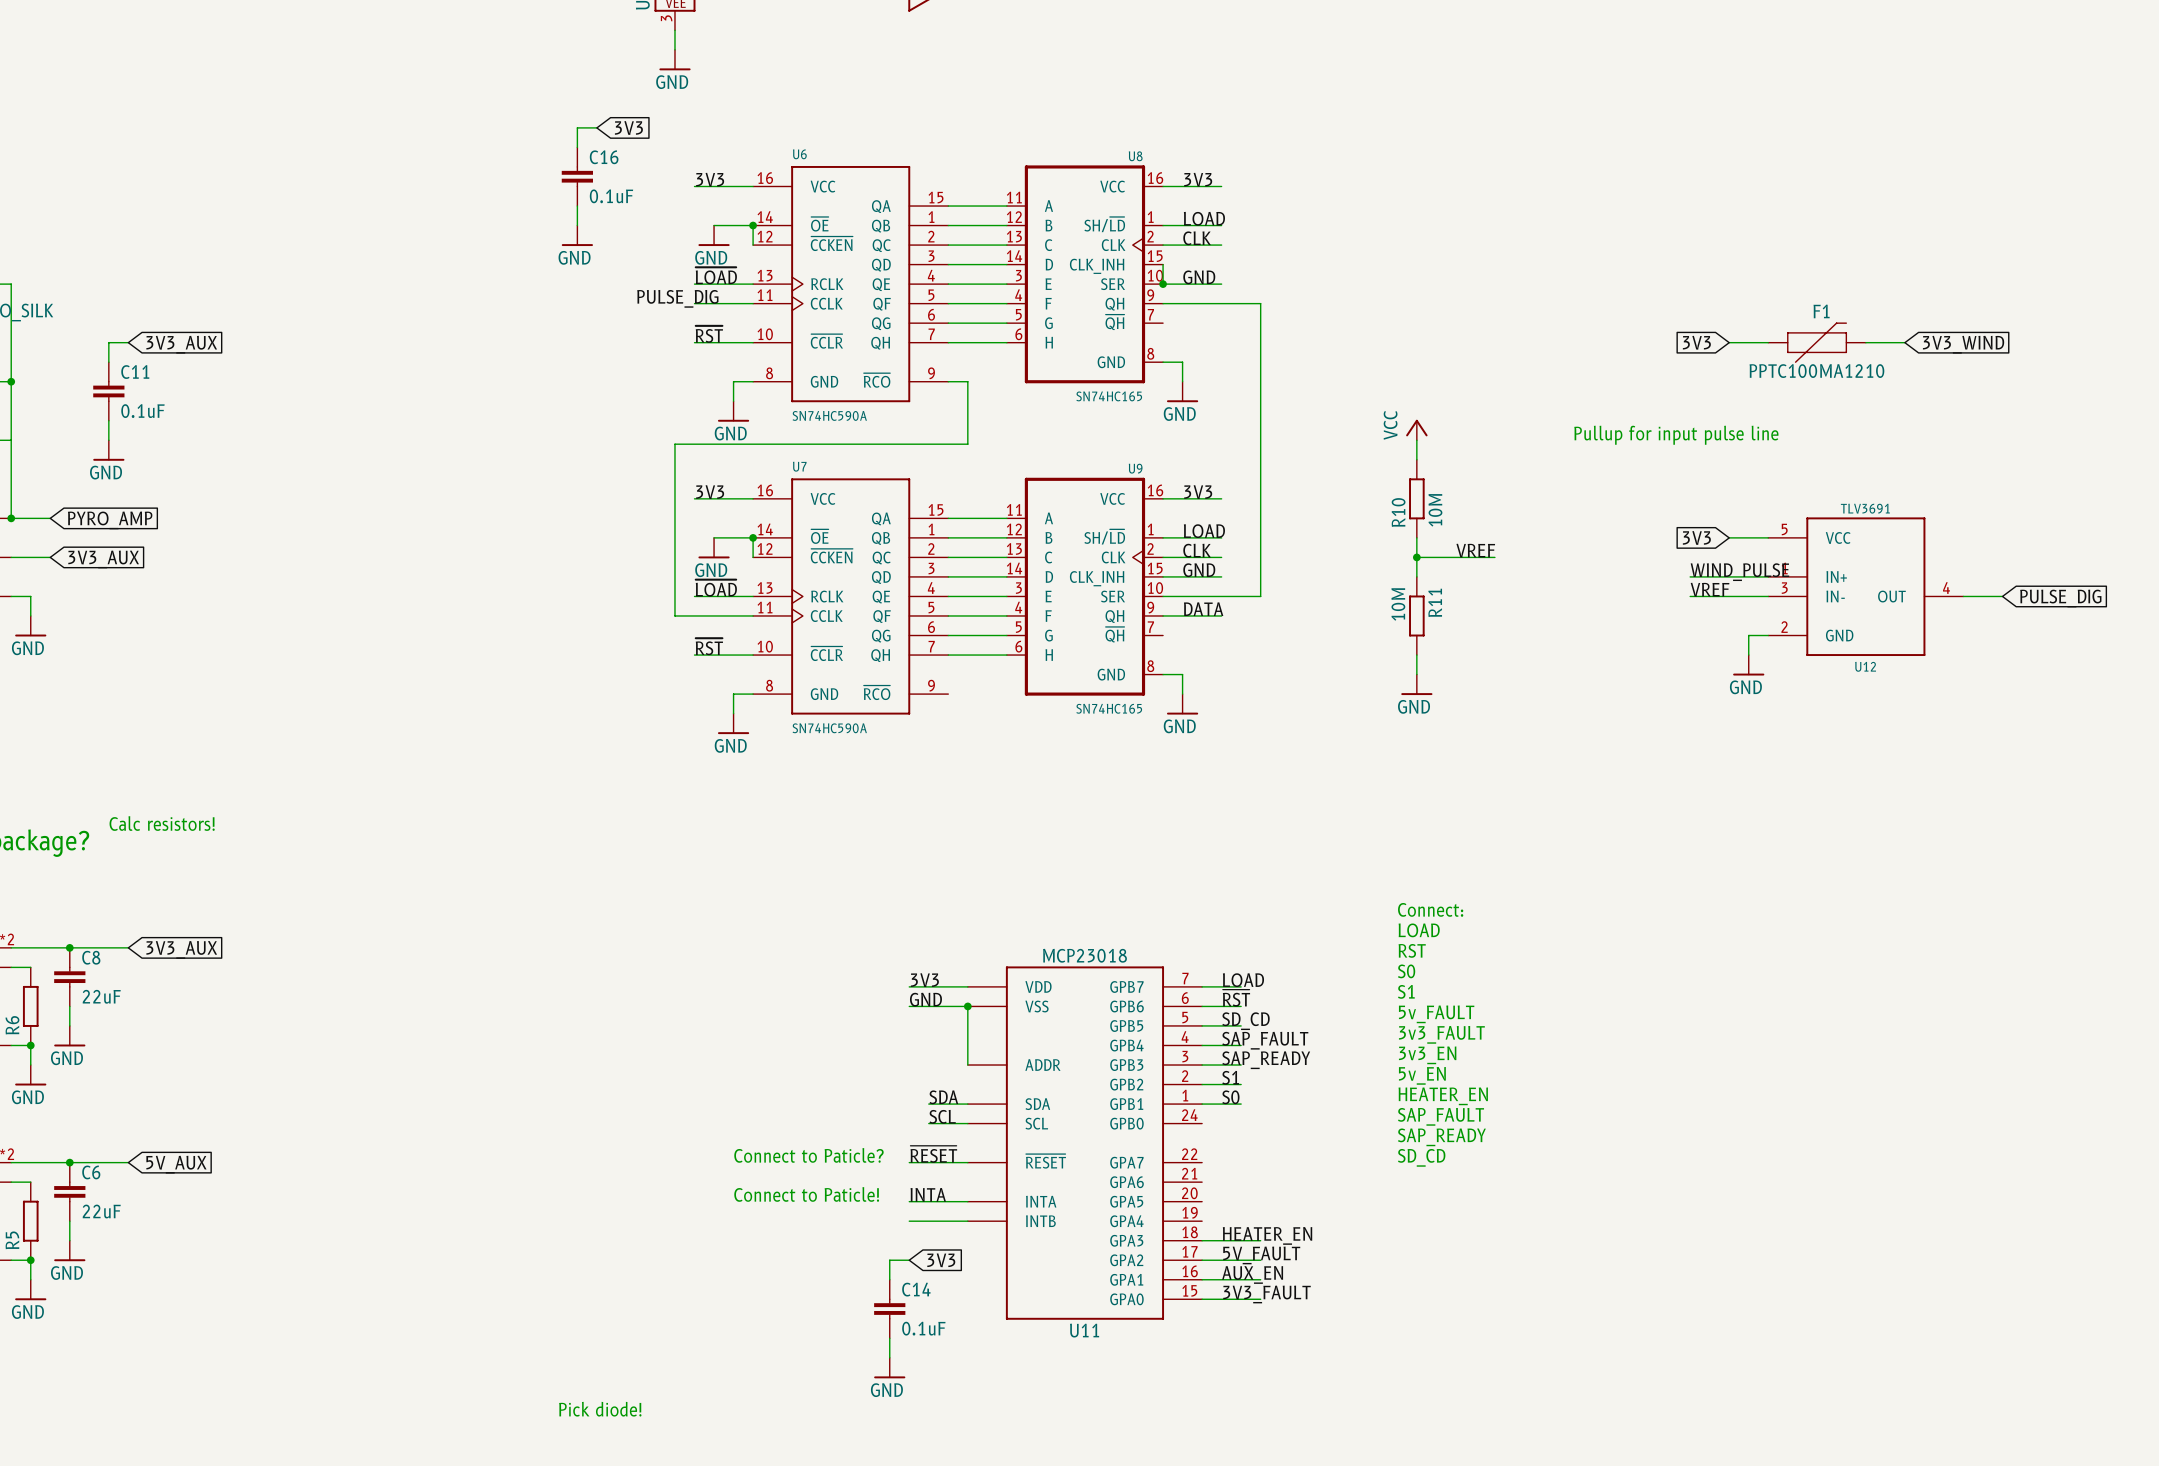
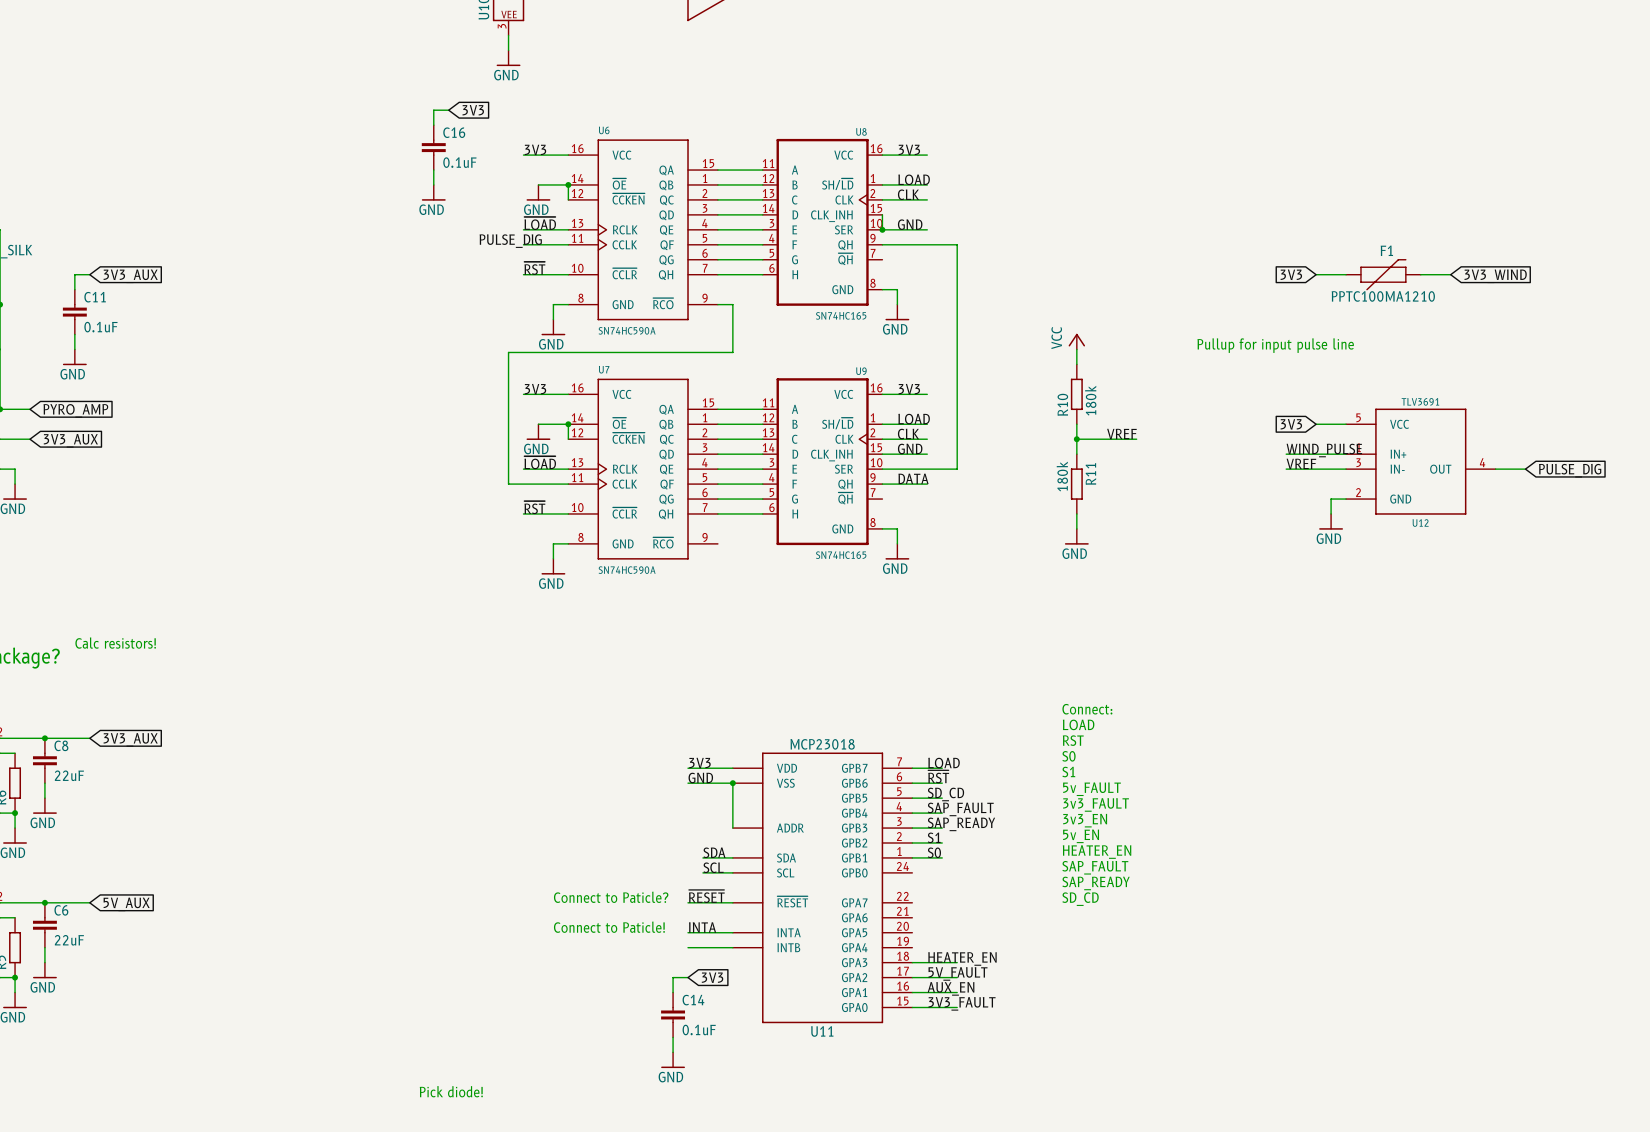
R10 value: 10M (1435, 510) -> 180k (1090, 400)
R11 value: 10M (1398, 604) -> 180k (1062, 476)

